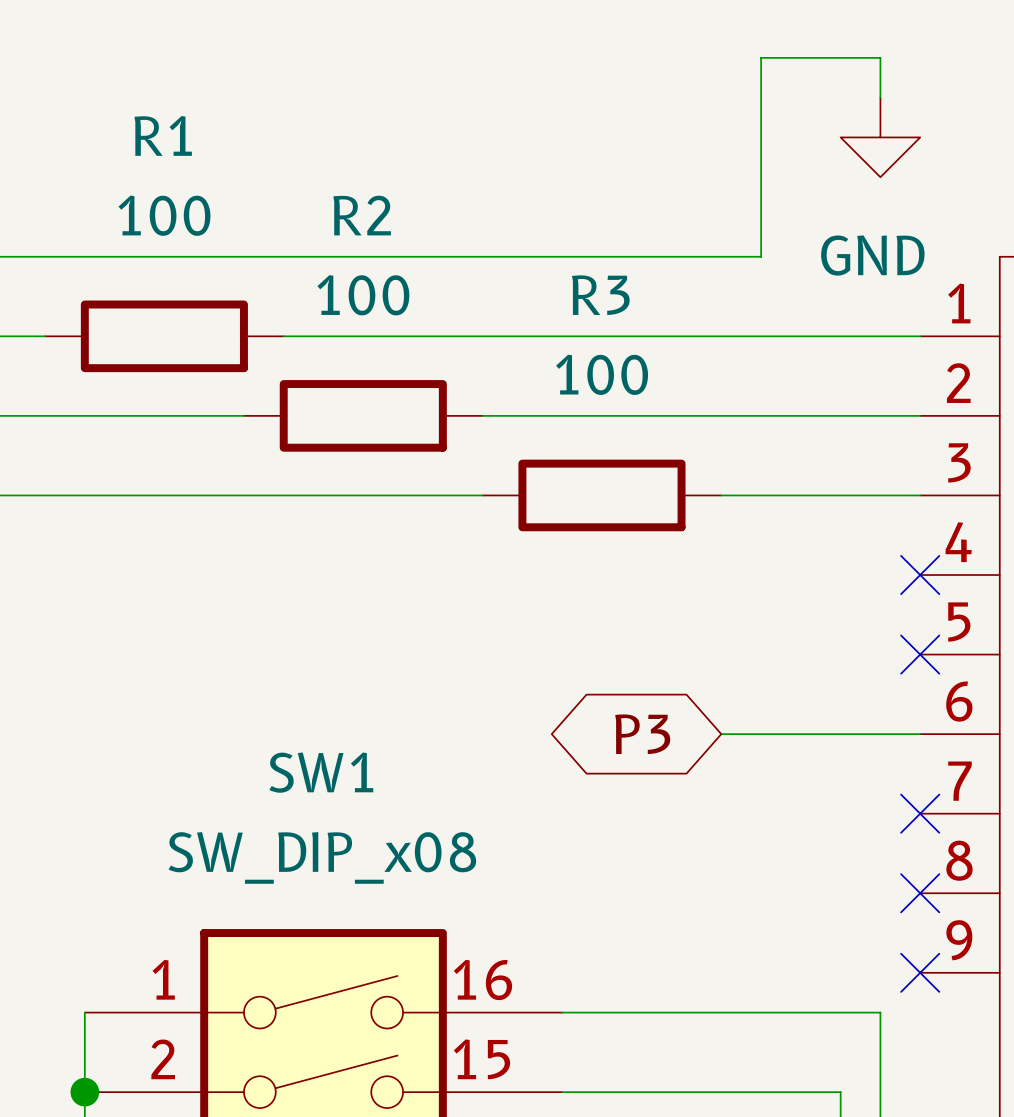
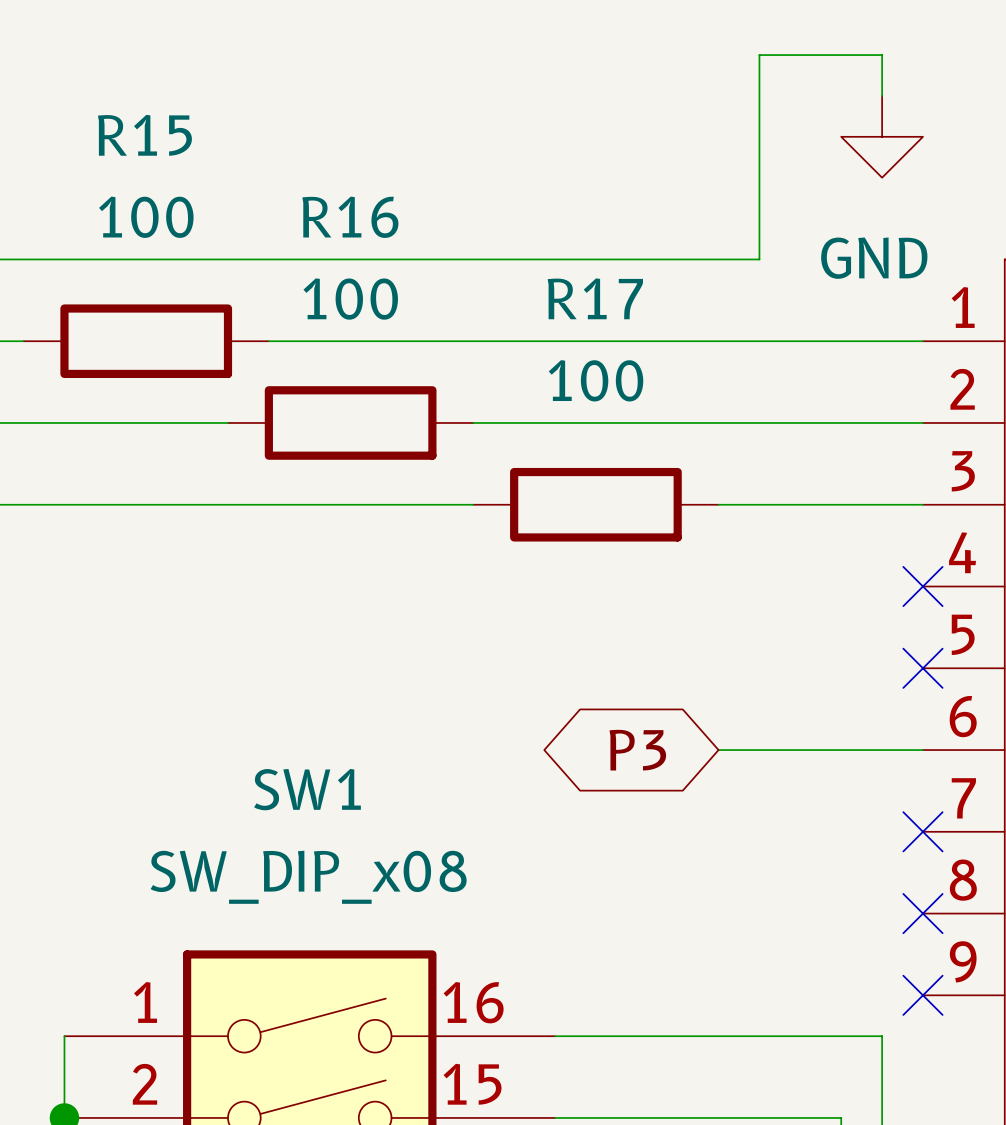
R1 name: R1 (163, 135) -> R15 (144, 135)
R2 name: R2 (362, 215) -> R16 (350, 217)
R3 name: R3 (600, 295) -> R17 (595, 298)

